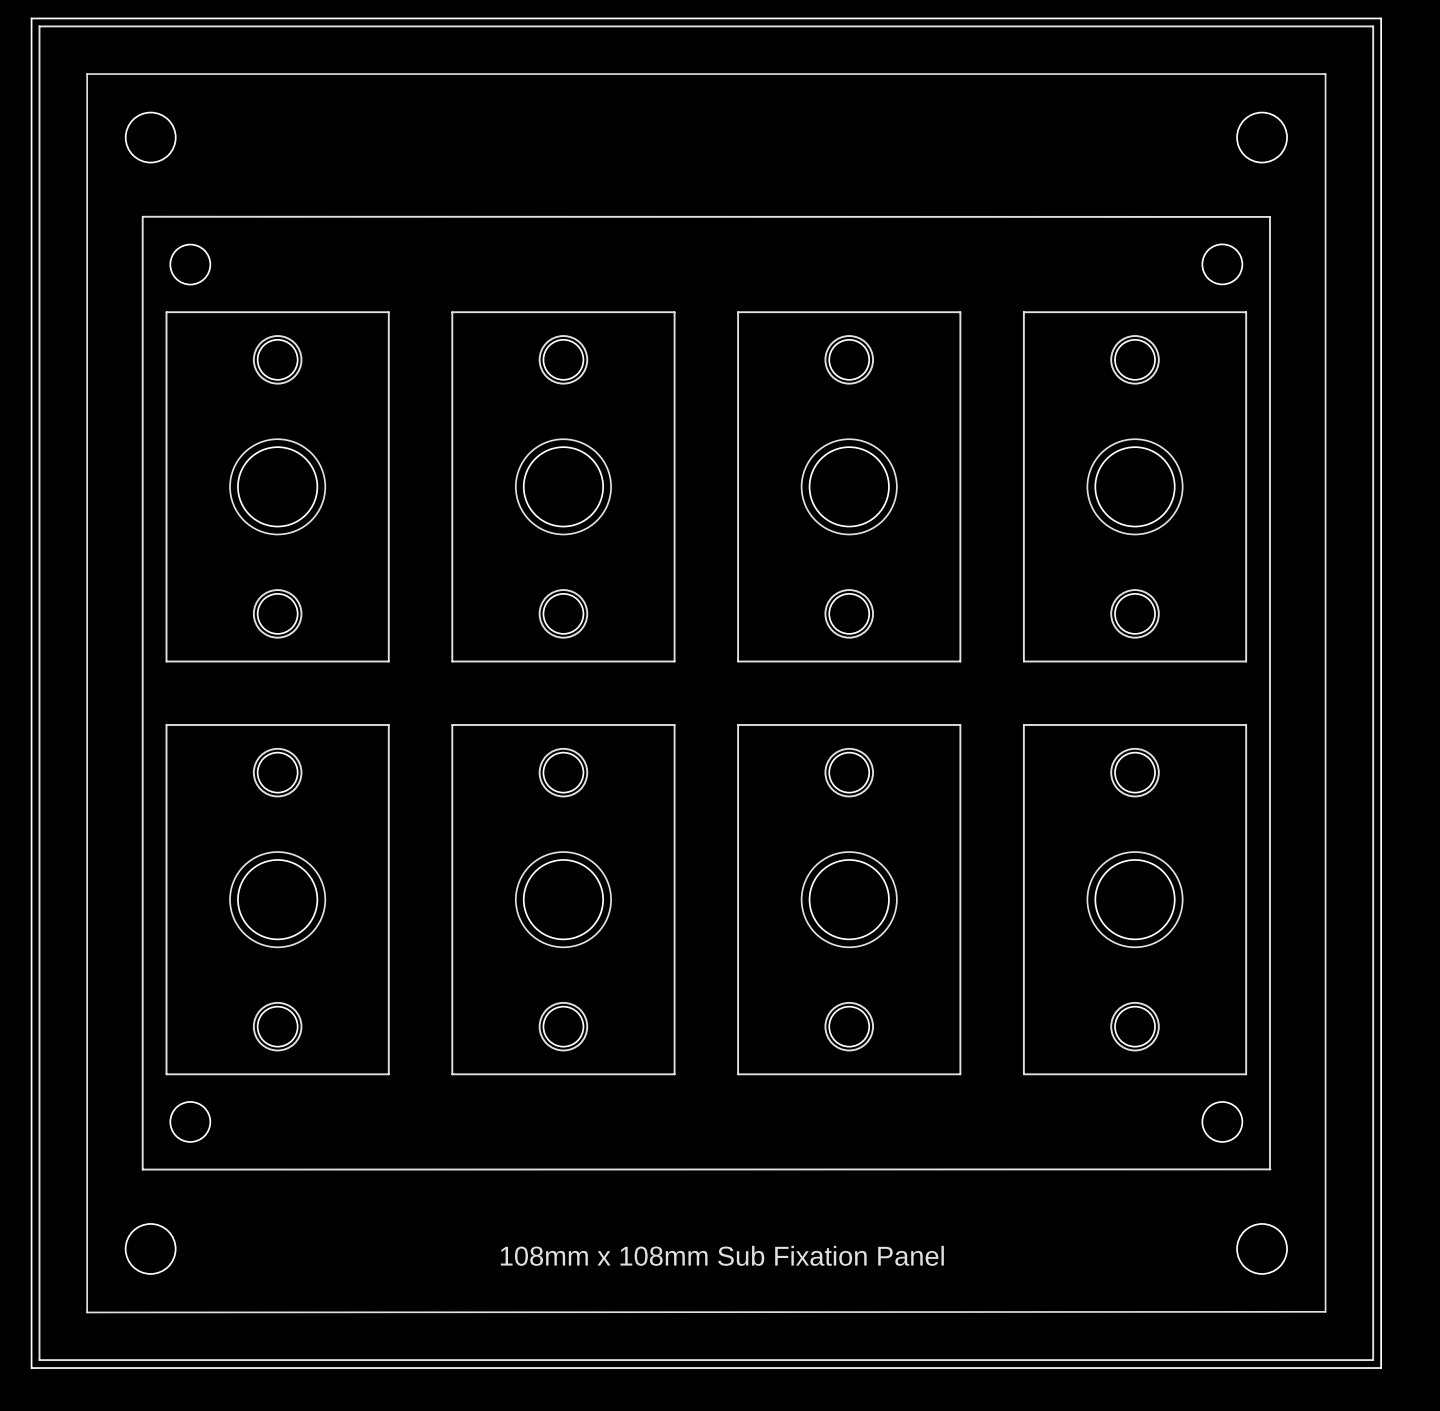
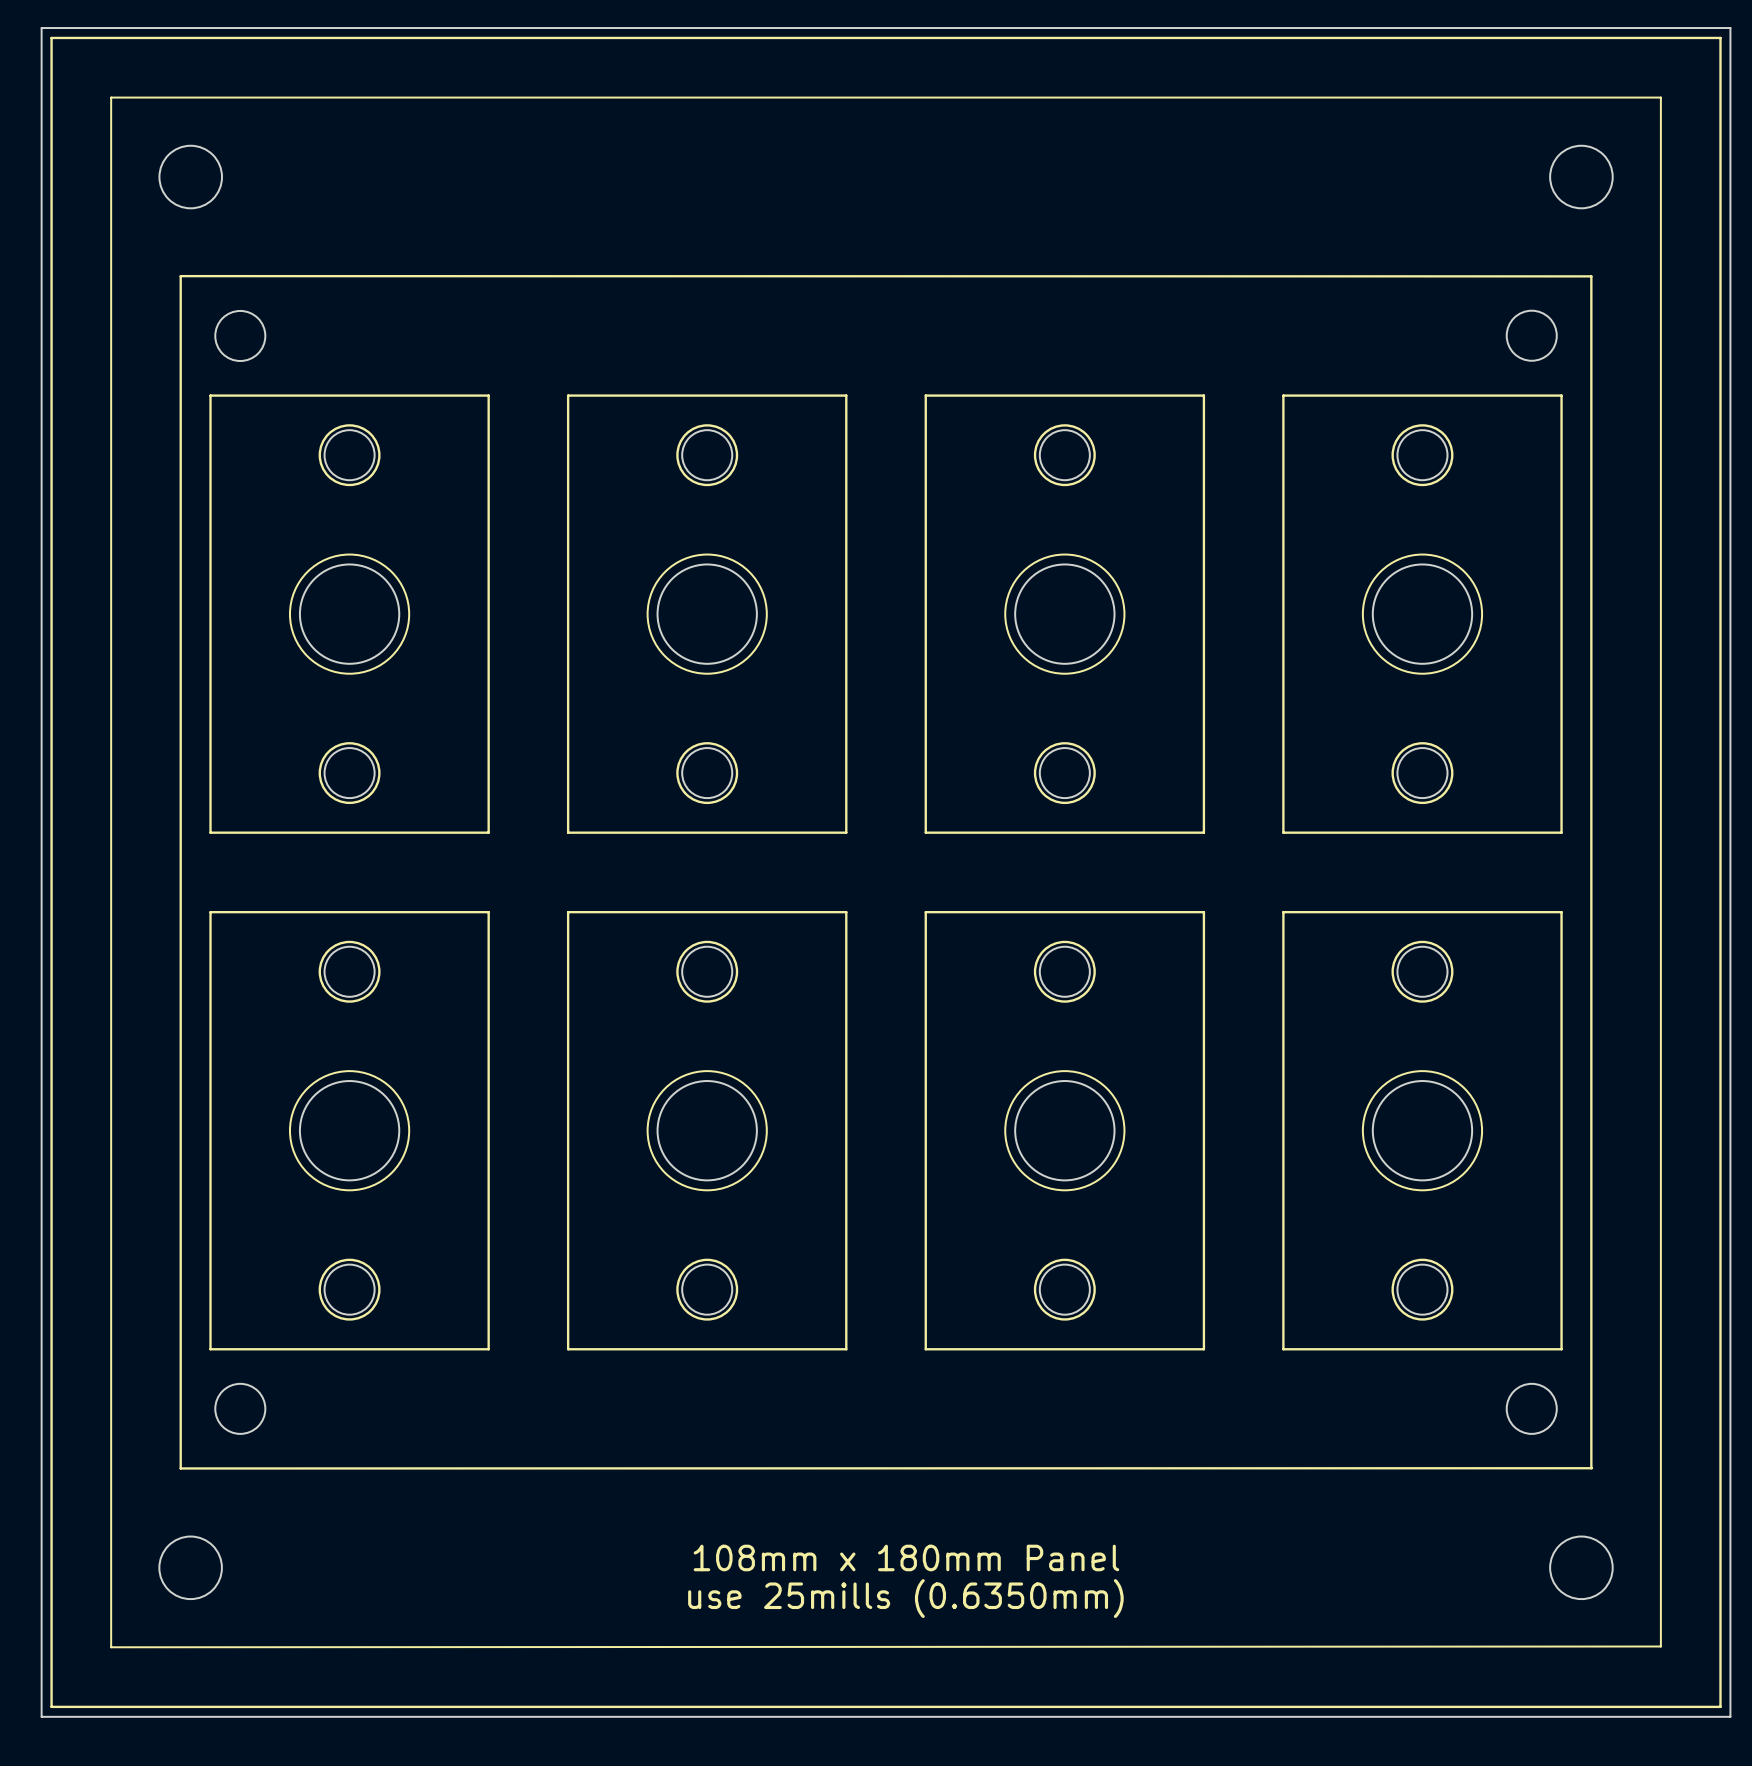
text: 108mm x 108mm Sub Fixation Panel (722, 1255) -> 108mm x 180mm Panel (906, 1557)
text: none -> use 25mills (0.6350mm) (905, 1598)

